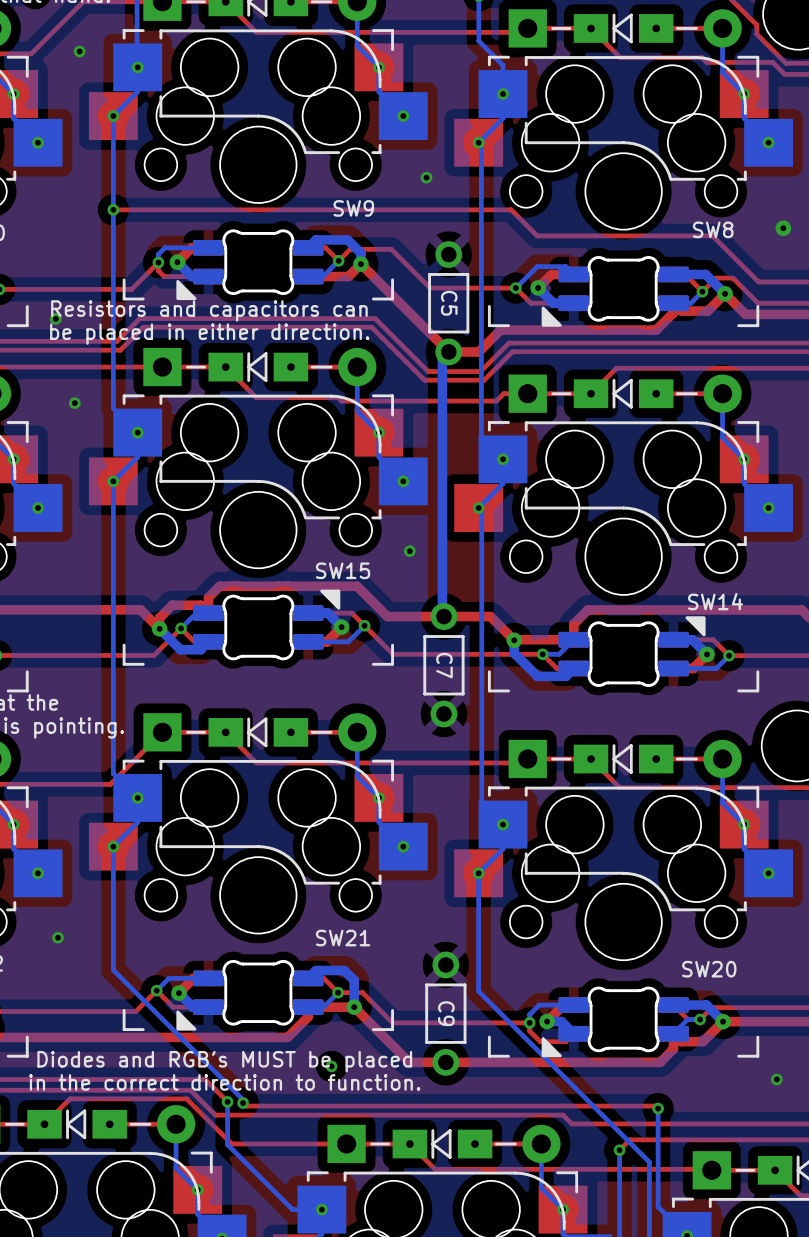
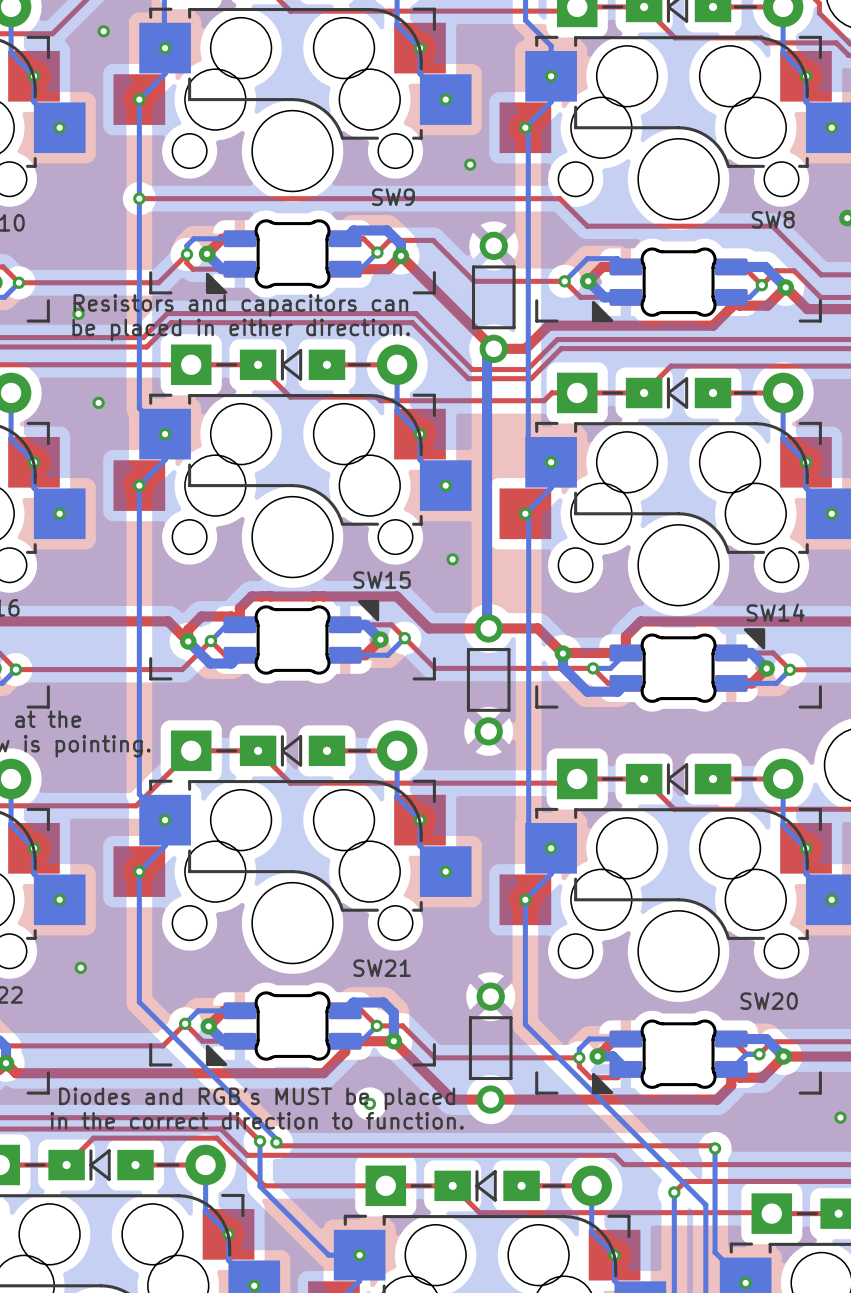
C5 name: C5 (449, 303) -> none
C7 name: C7 (444, 665) -> none
C9 name: C9 (446, 1013) -> none

